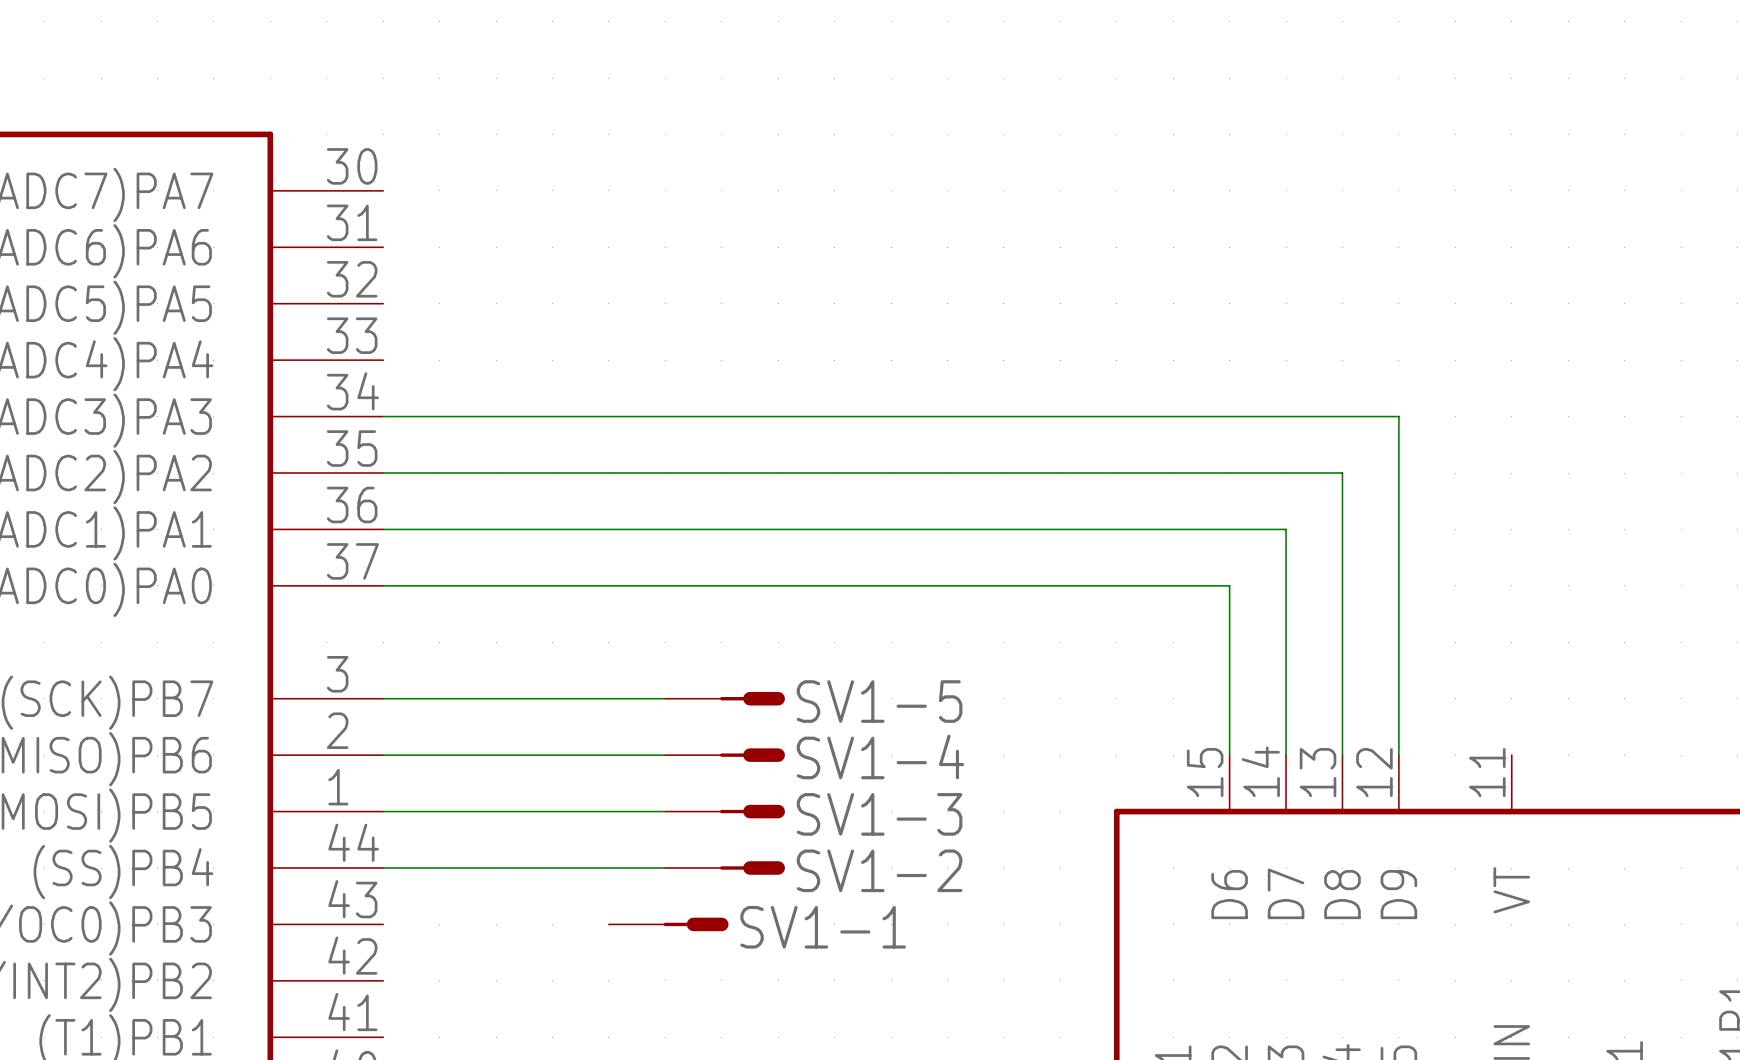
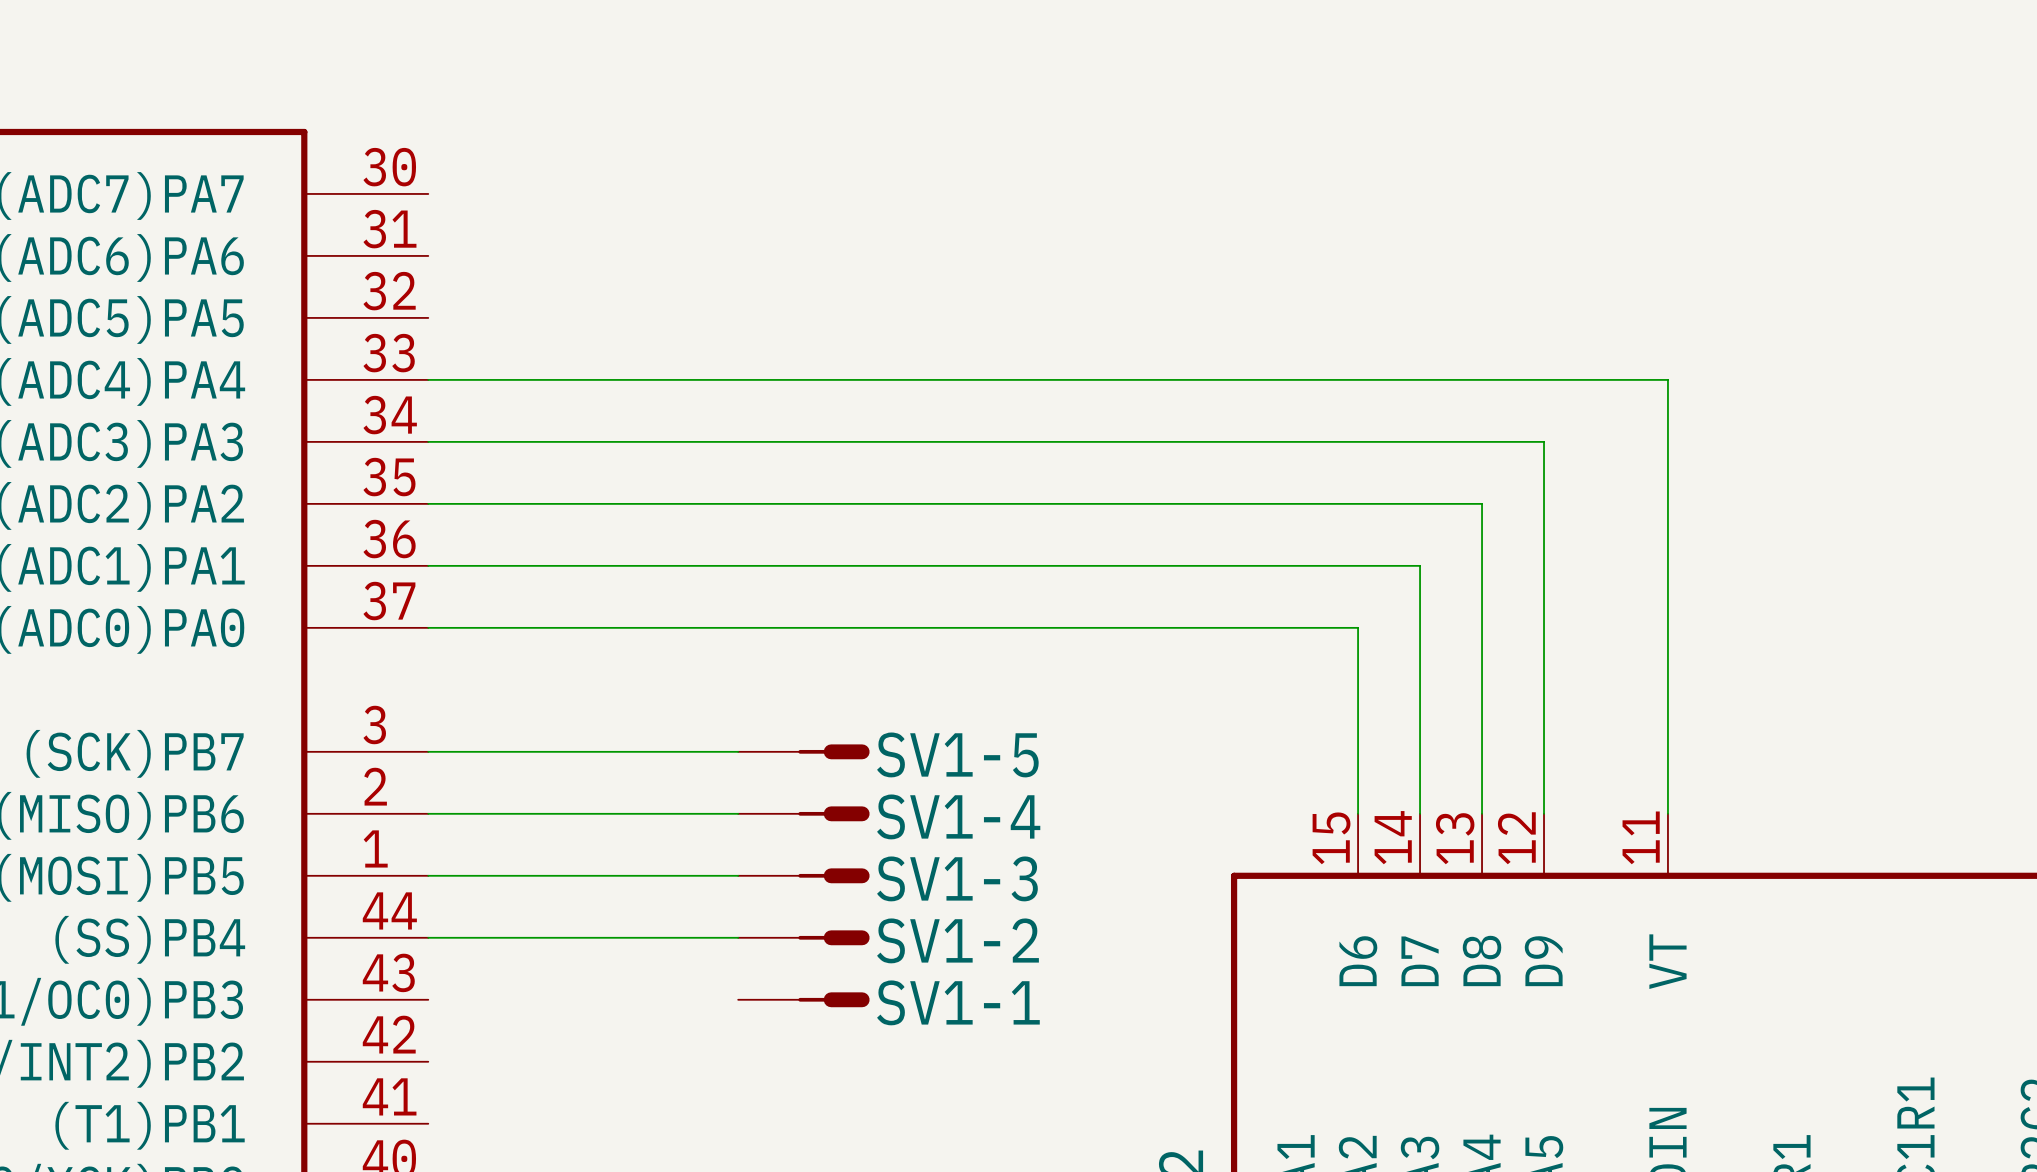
wire: none -> (428, 379) (1667, 379) (1667, 813)
SV1-1 position: (668, 924) -> (803, 999)

